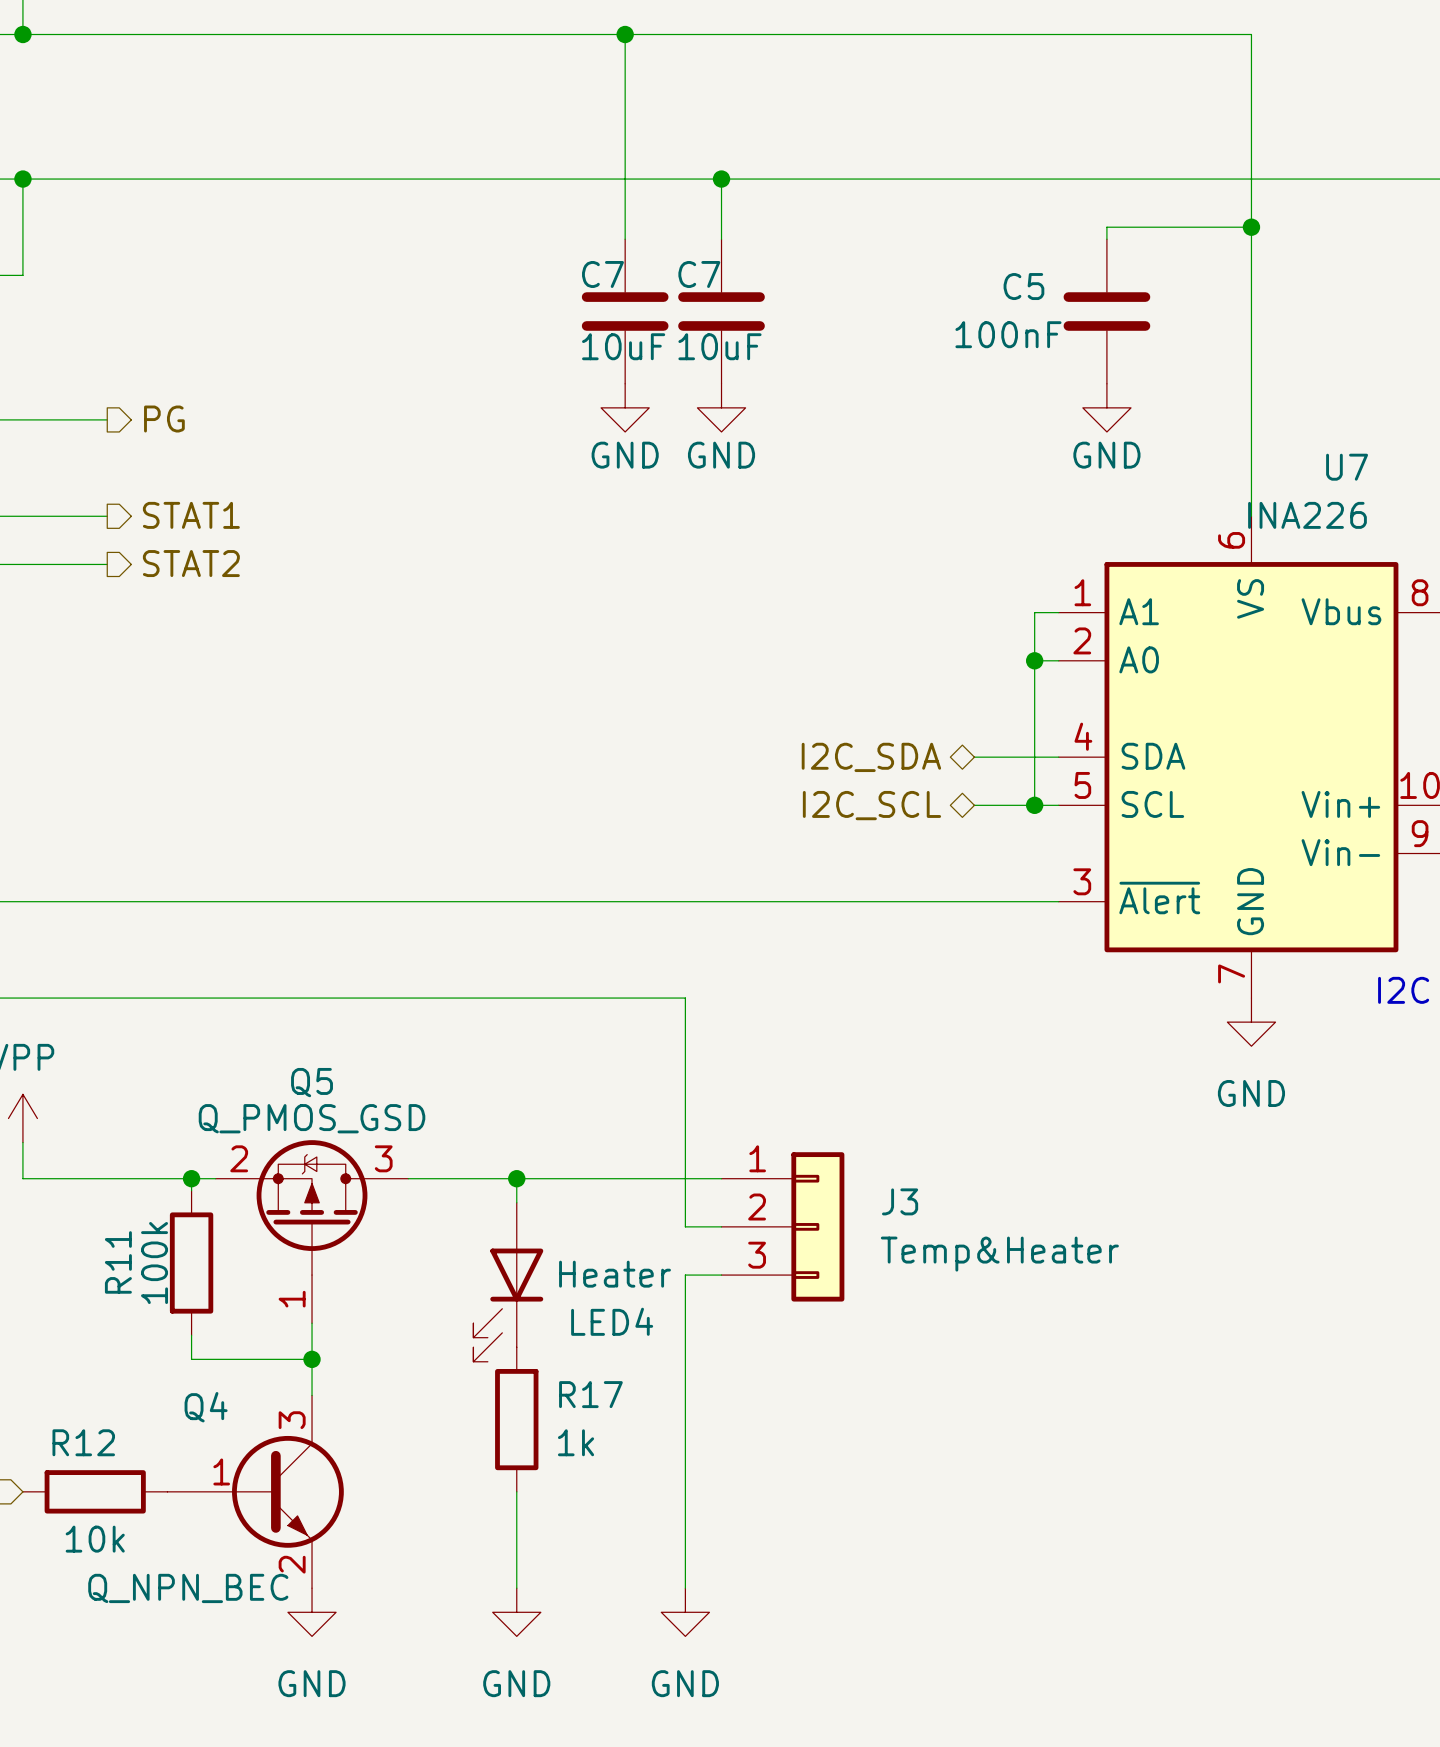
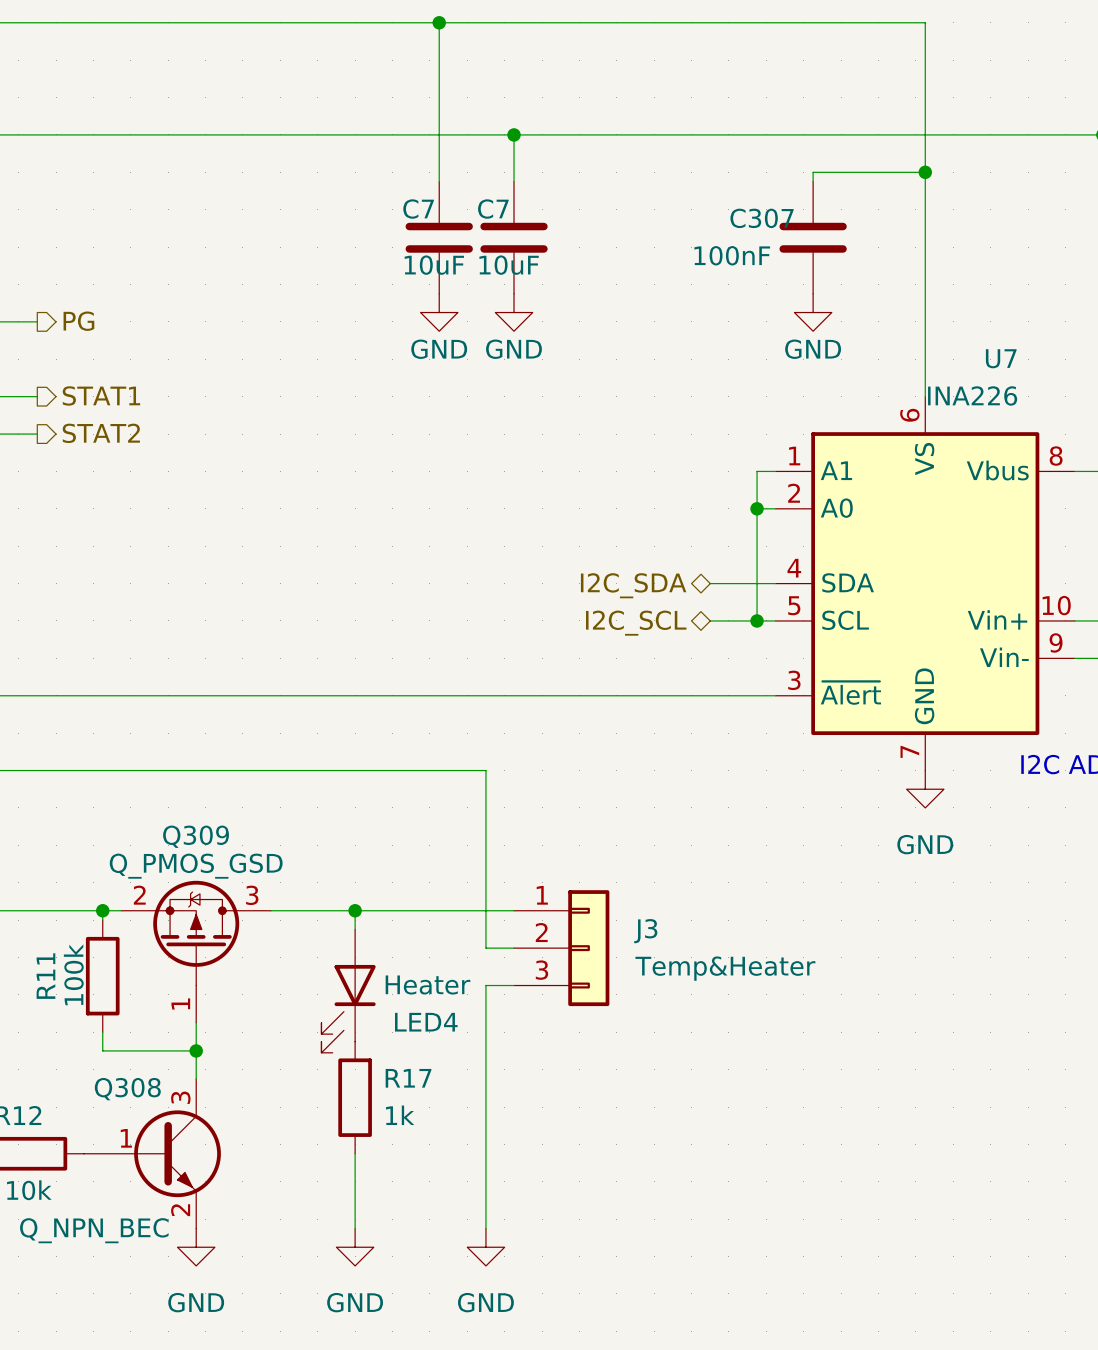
C5 name: C5 (1023, 286) -> C307 (762, 218)
Q5 name: Q5 (312, 1082) -> Q309 (196, 836)
Q4 name: Q4 (206, 1407) -> Q308 (127, 1089)

